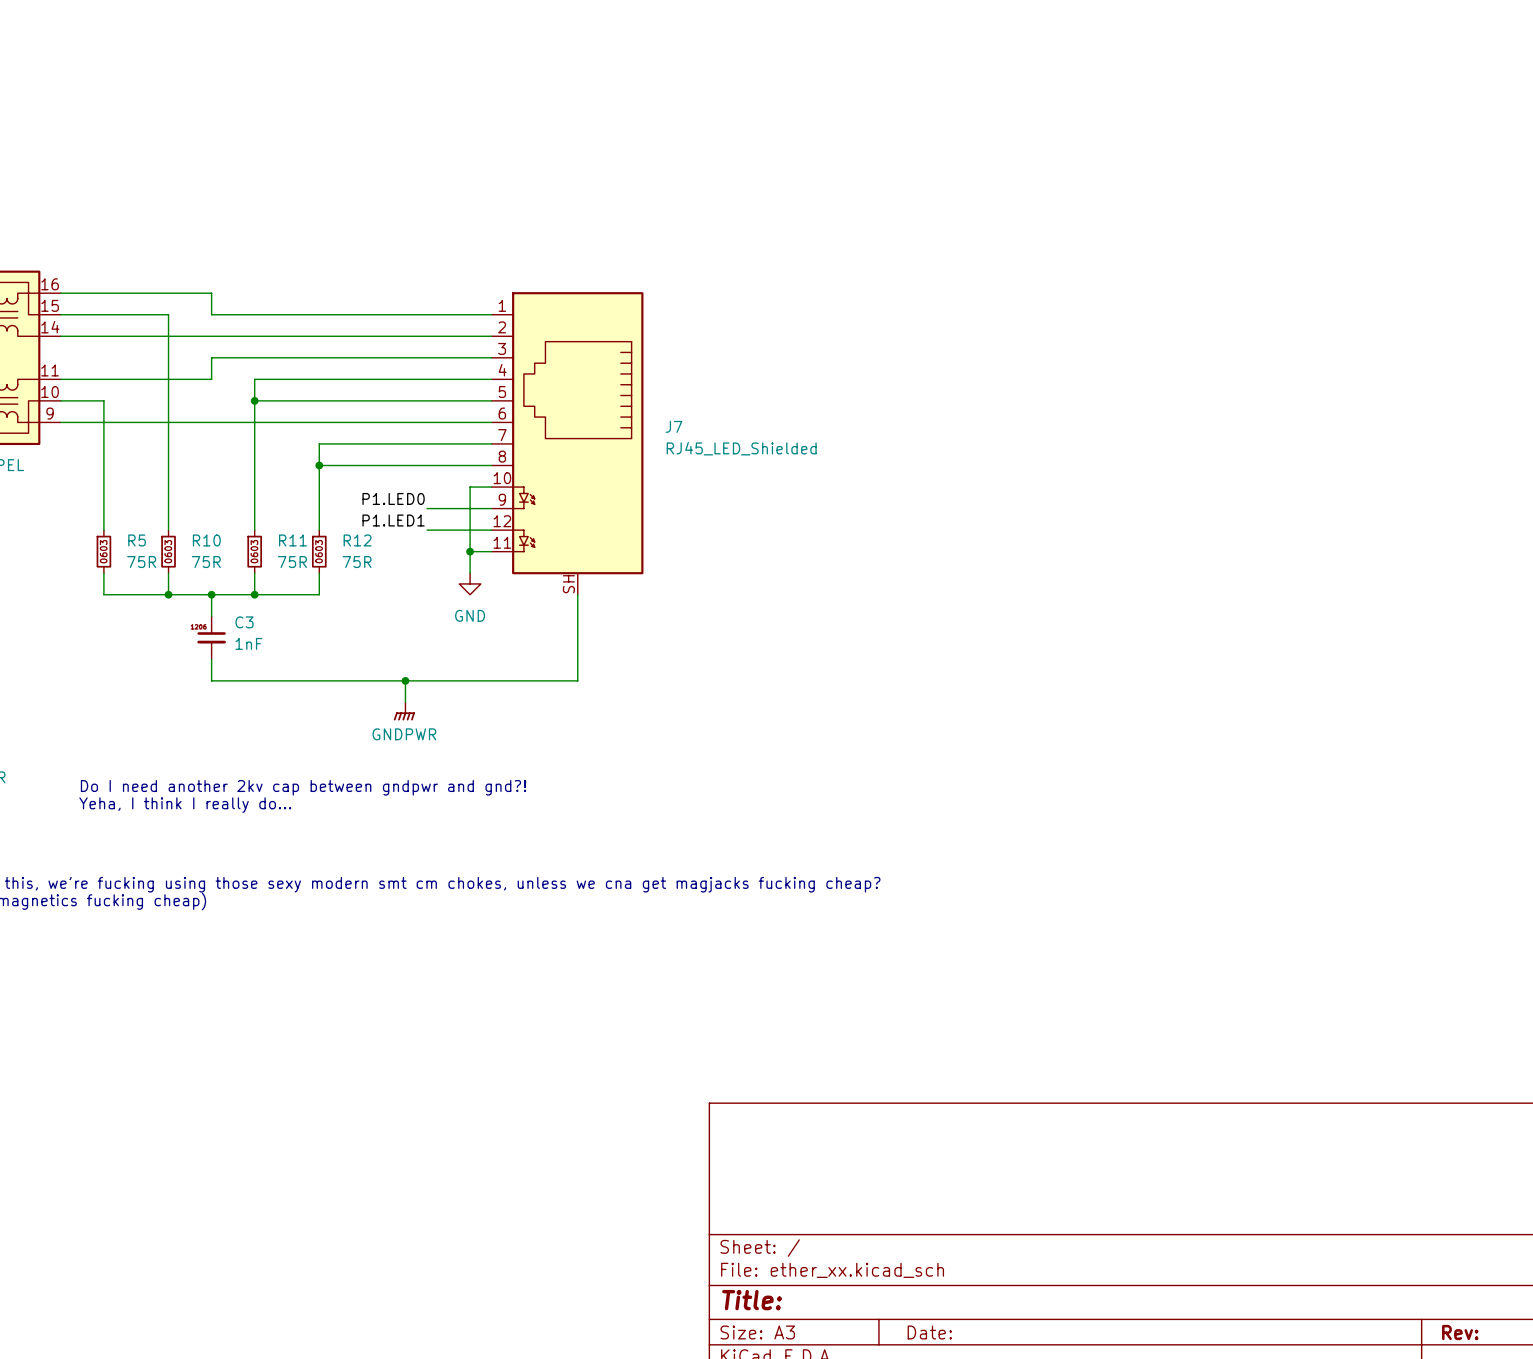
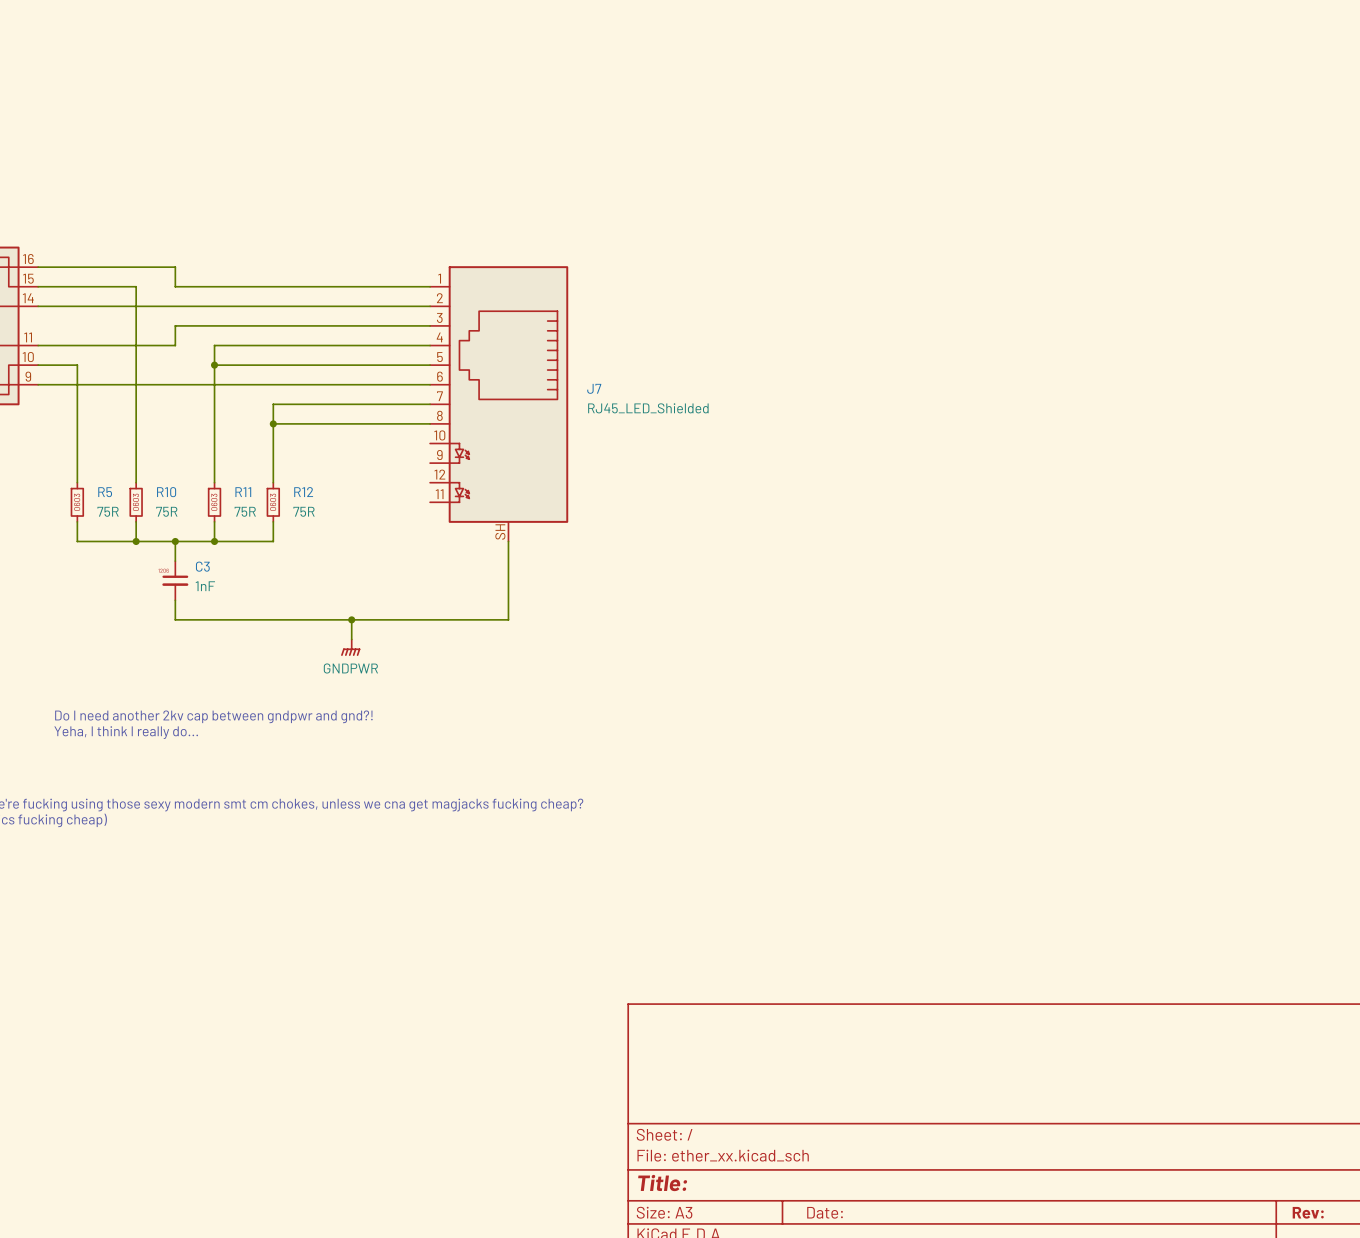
wire: (491, 487) (470, 487) (470, 573) -> none
label: P1.LED0 (393, 498) -> none
wire: (426, 508) (491, 508) -> none
label: P1.LED1 (393, 520) -> none
wire: (426, 530) (491, 530) -> none
wire: (470, 551) (491, 551) -> none
junction: (470, 551) -> none
power symbol: GND (470, 583) -> none

